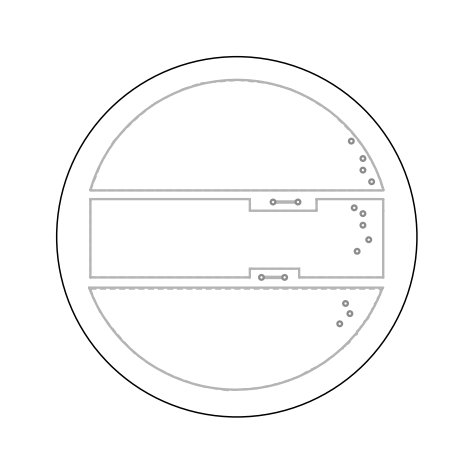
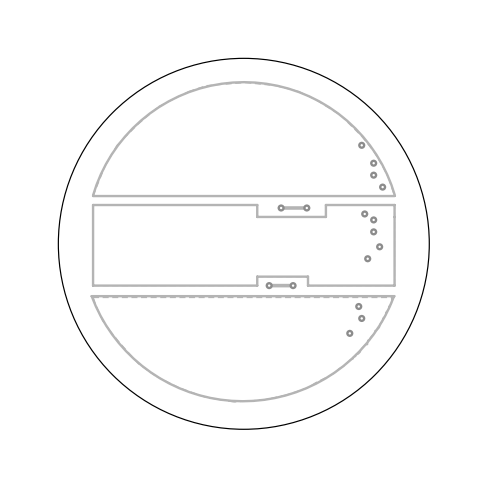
via: none -> (358, 306)
via: (345, 303) -> none
via: none -> (361, 318)
via: (349, 313) -> none

